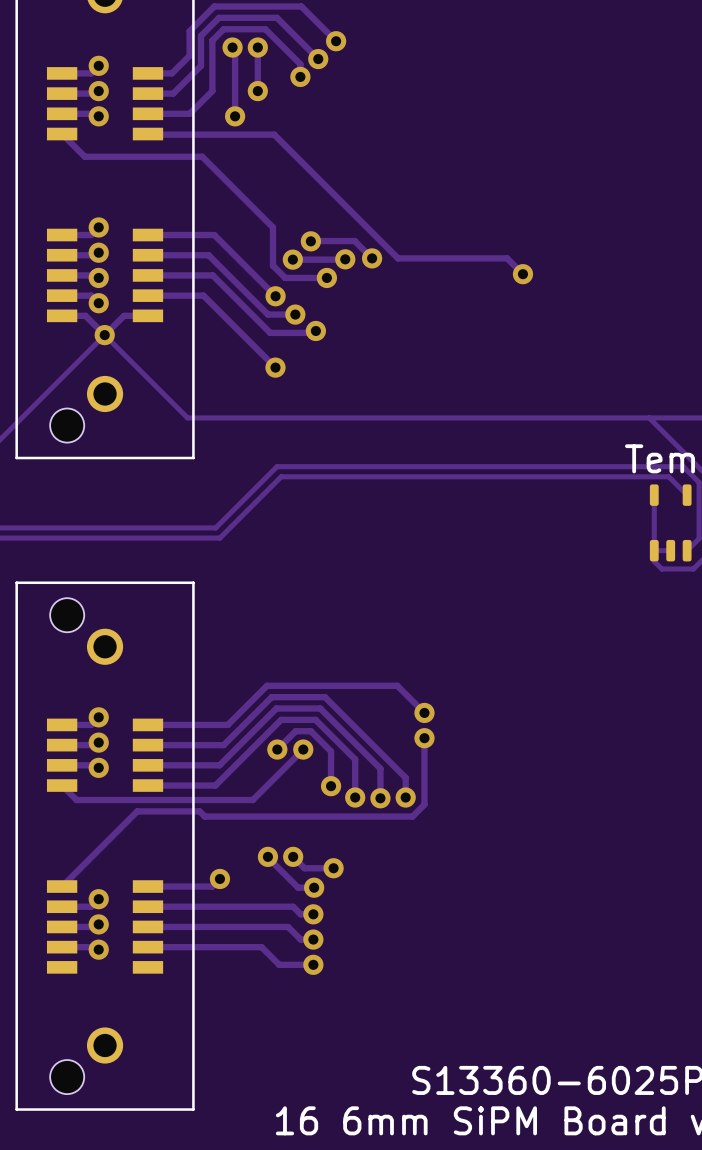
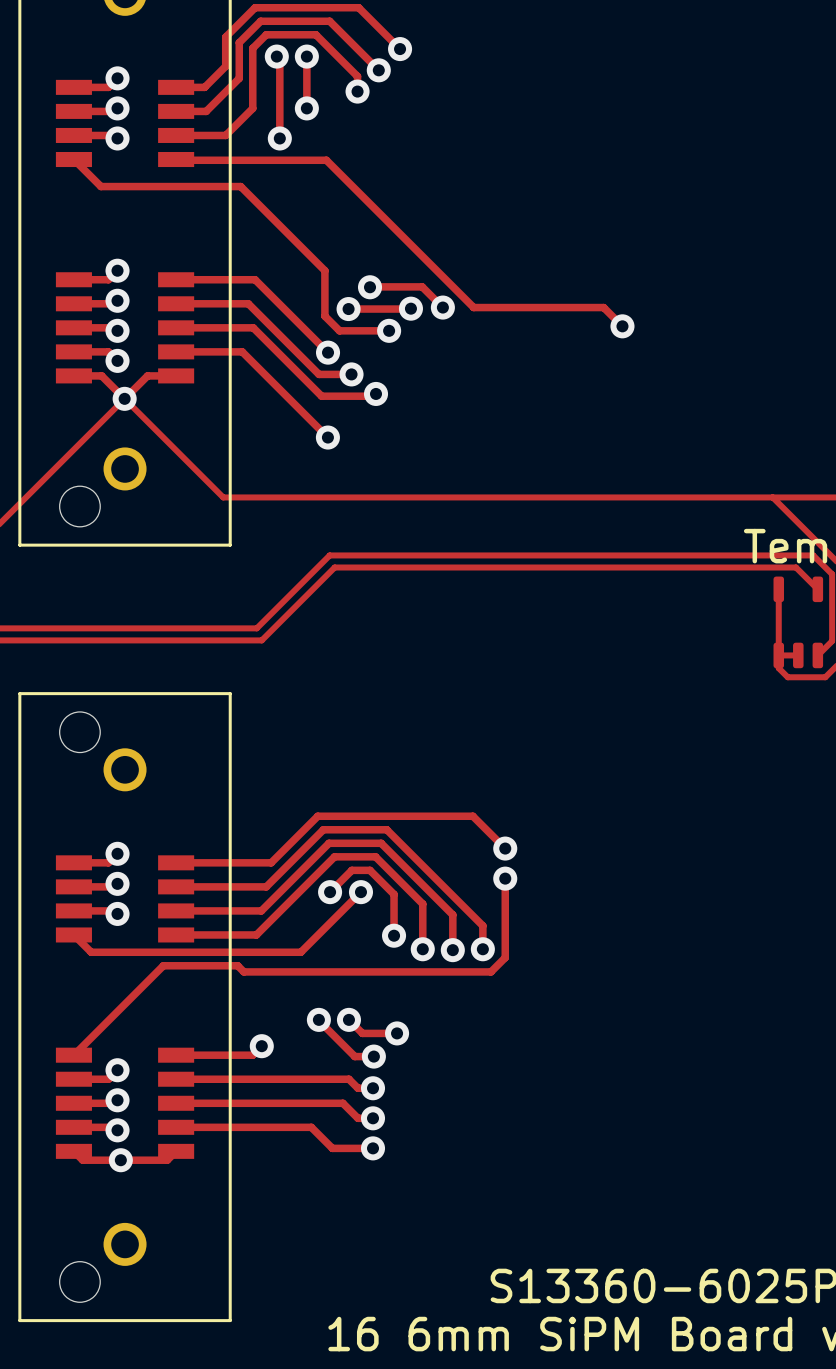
track: none -> (73, 1151) (82, 1160) (167, 1160) (176, 1151)
via: none -> (120, 1160)

